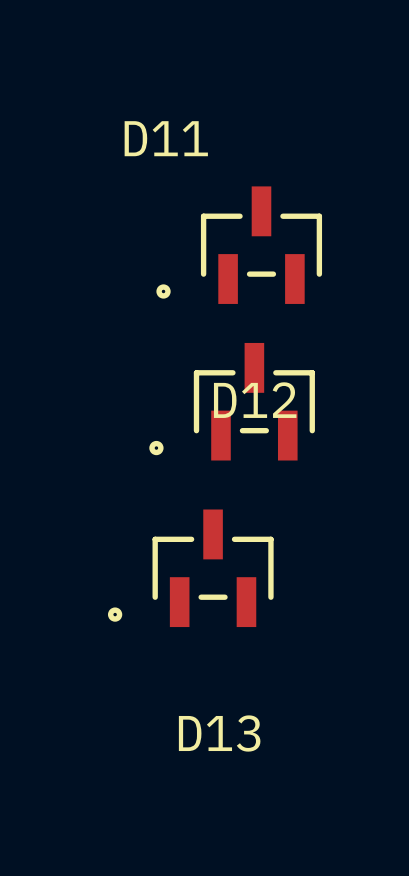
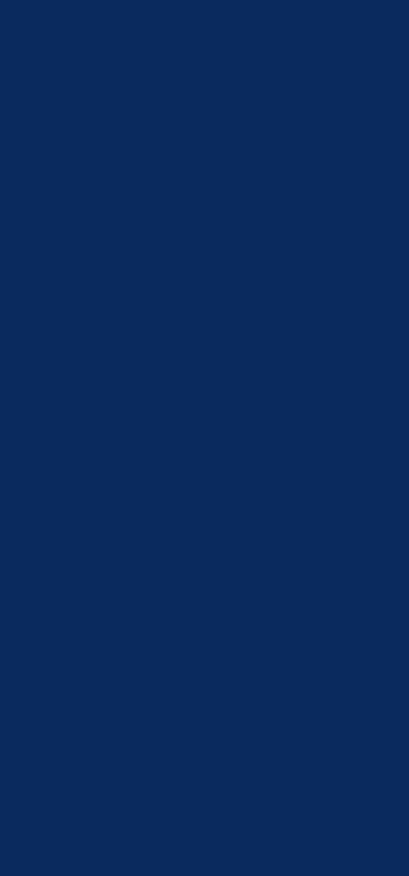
D11: (239, 245) -> none
D12: (232, 401) -> none
D13: (190, 568) -> none

